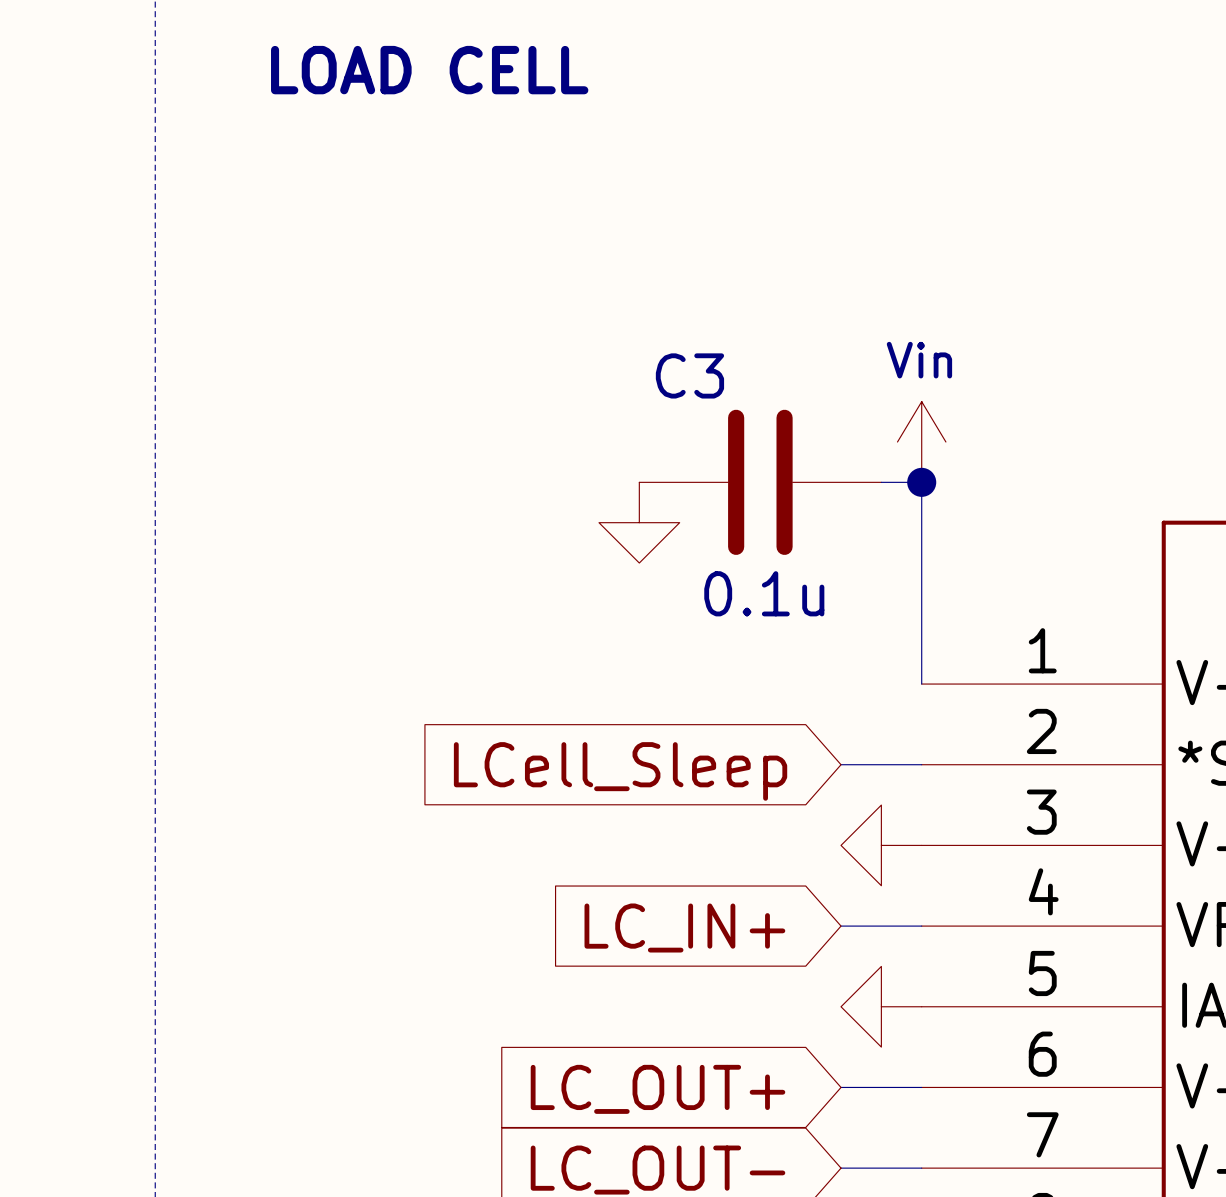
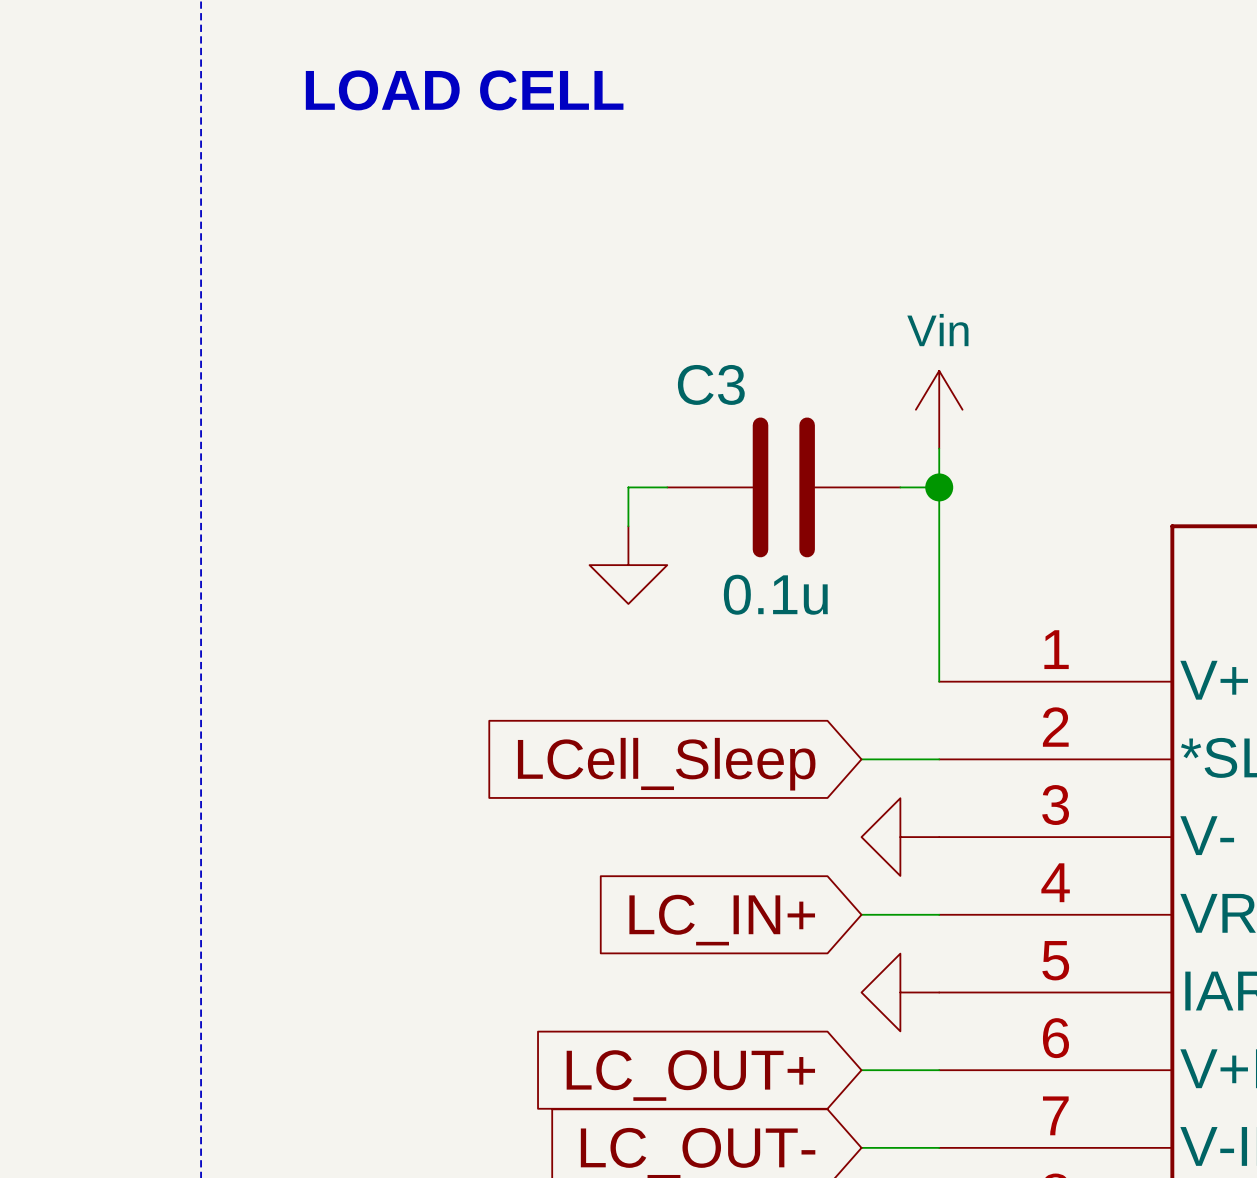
power symbol position: Vin (921, 442) -> Vin (939, 409)
wire: none -> (667, 487) (628, 487) (628, 526)
power symbol position: (639, 522) -> (628, 565)

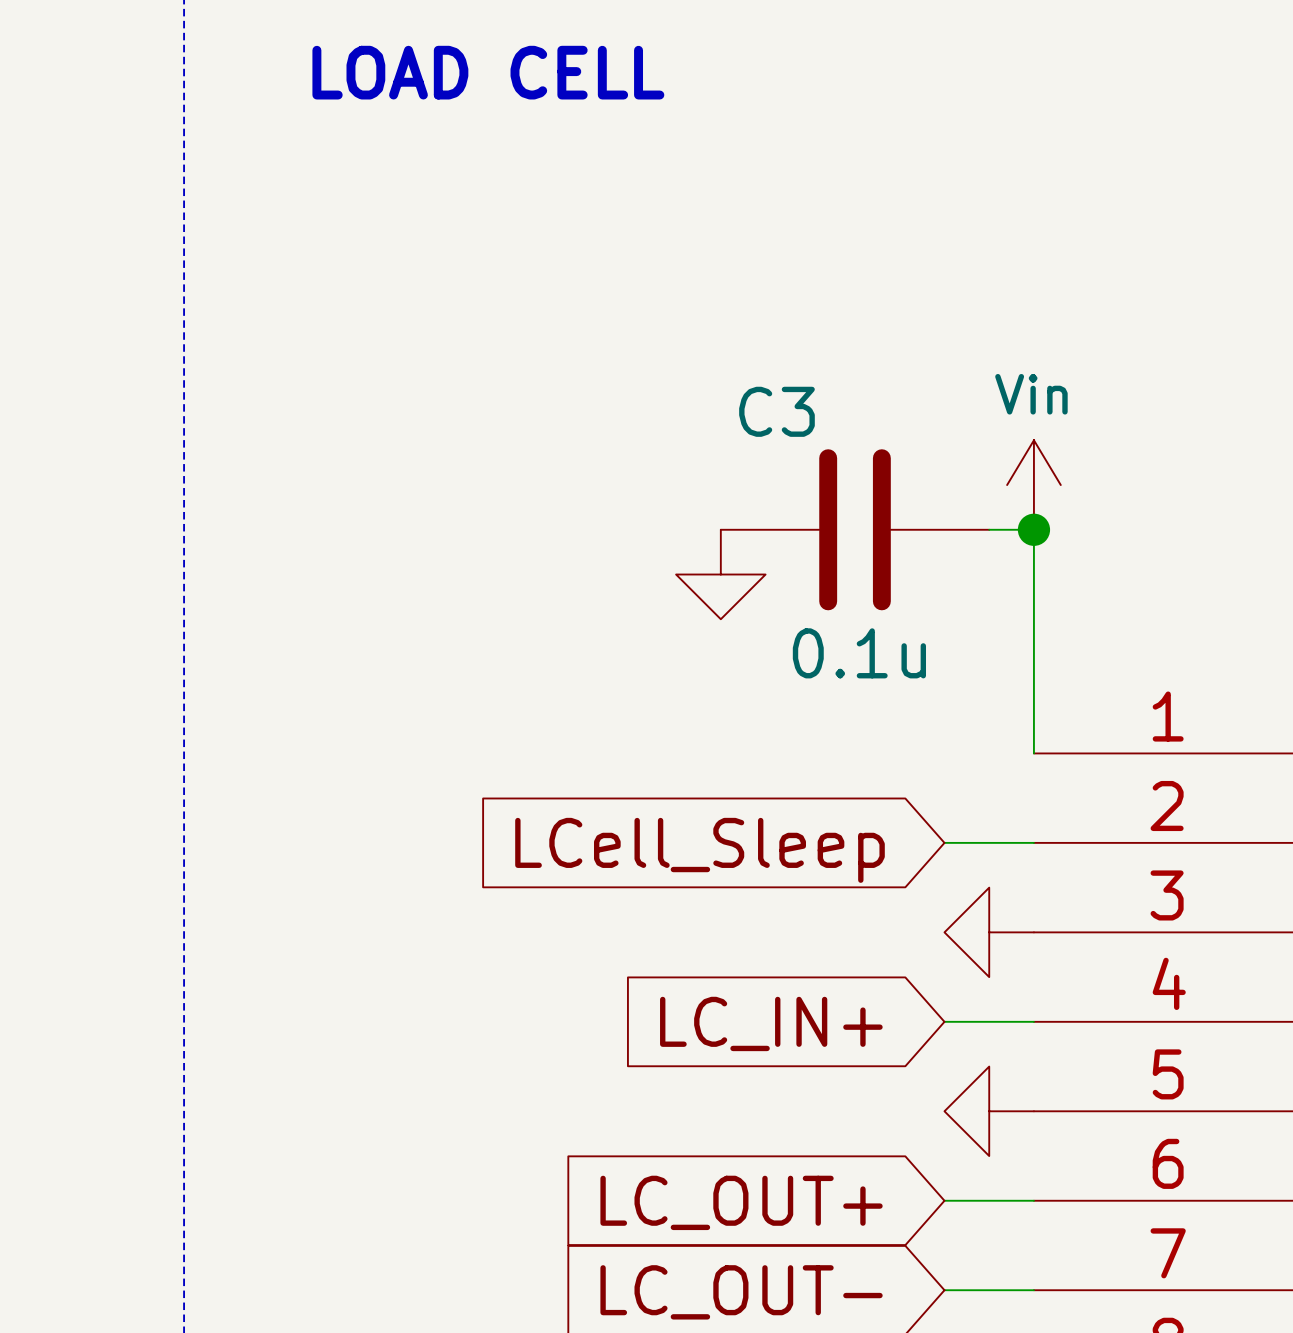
power symbol position: Vin (939, 409) -> Vin (1033, 485)
wire: (667, 487) (628, 487) (628, 526) -> none
power symbol position: (628, 565) -> (720, 574)

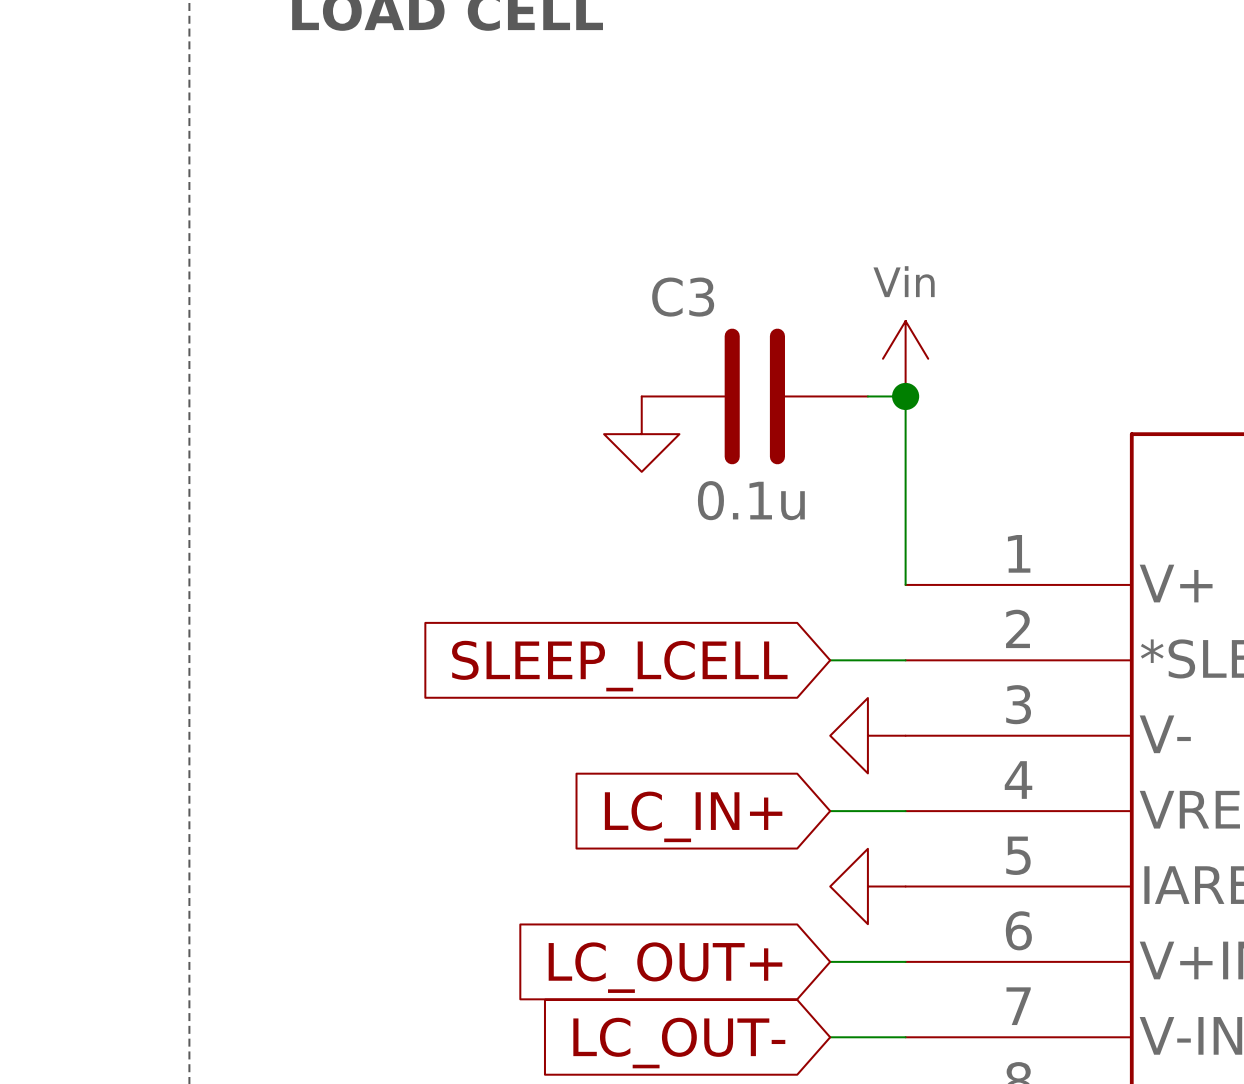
global label: LCell_Sleep (700, 850) -> SLEEP_LCELL (619, 666)

